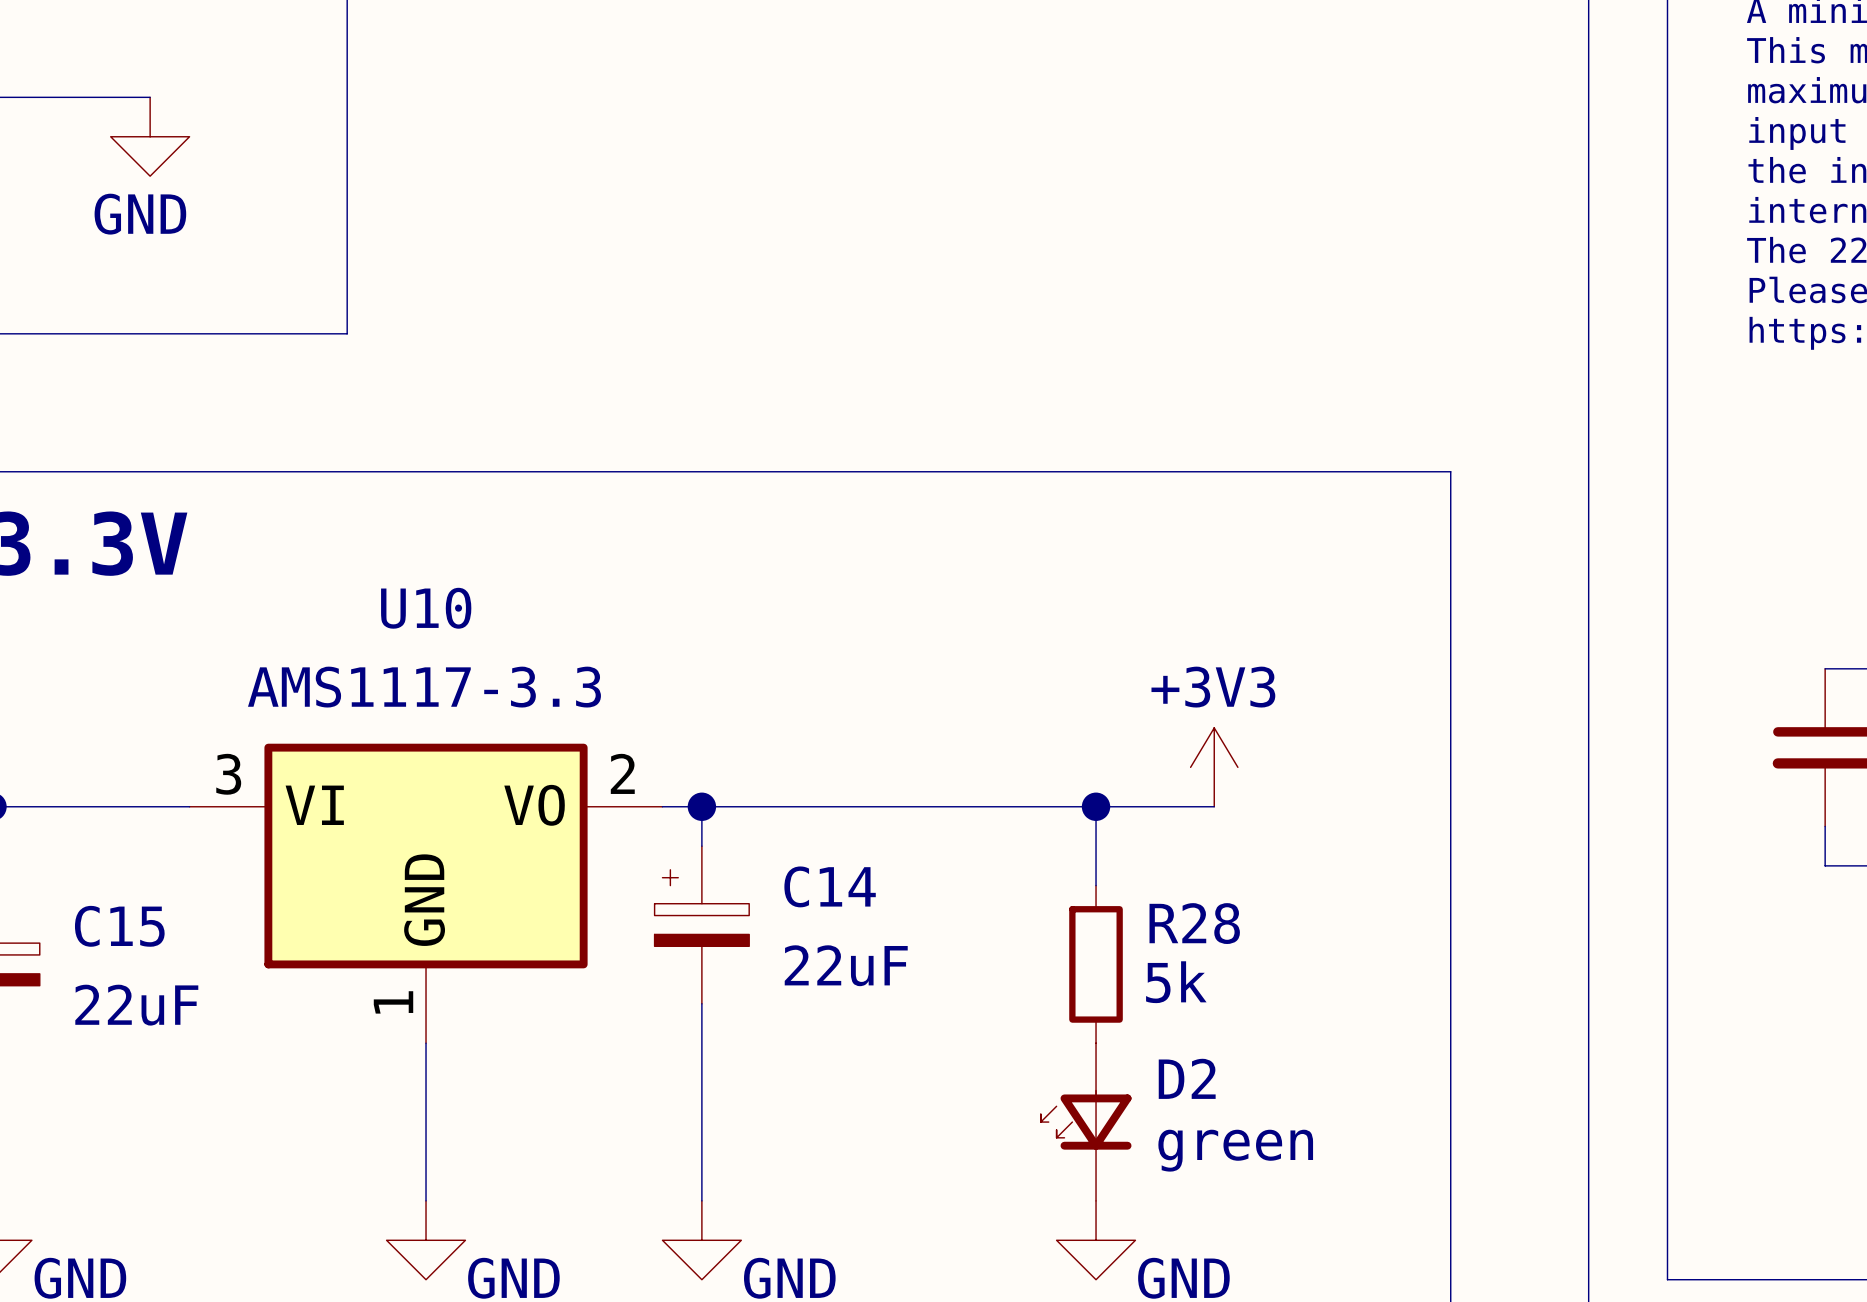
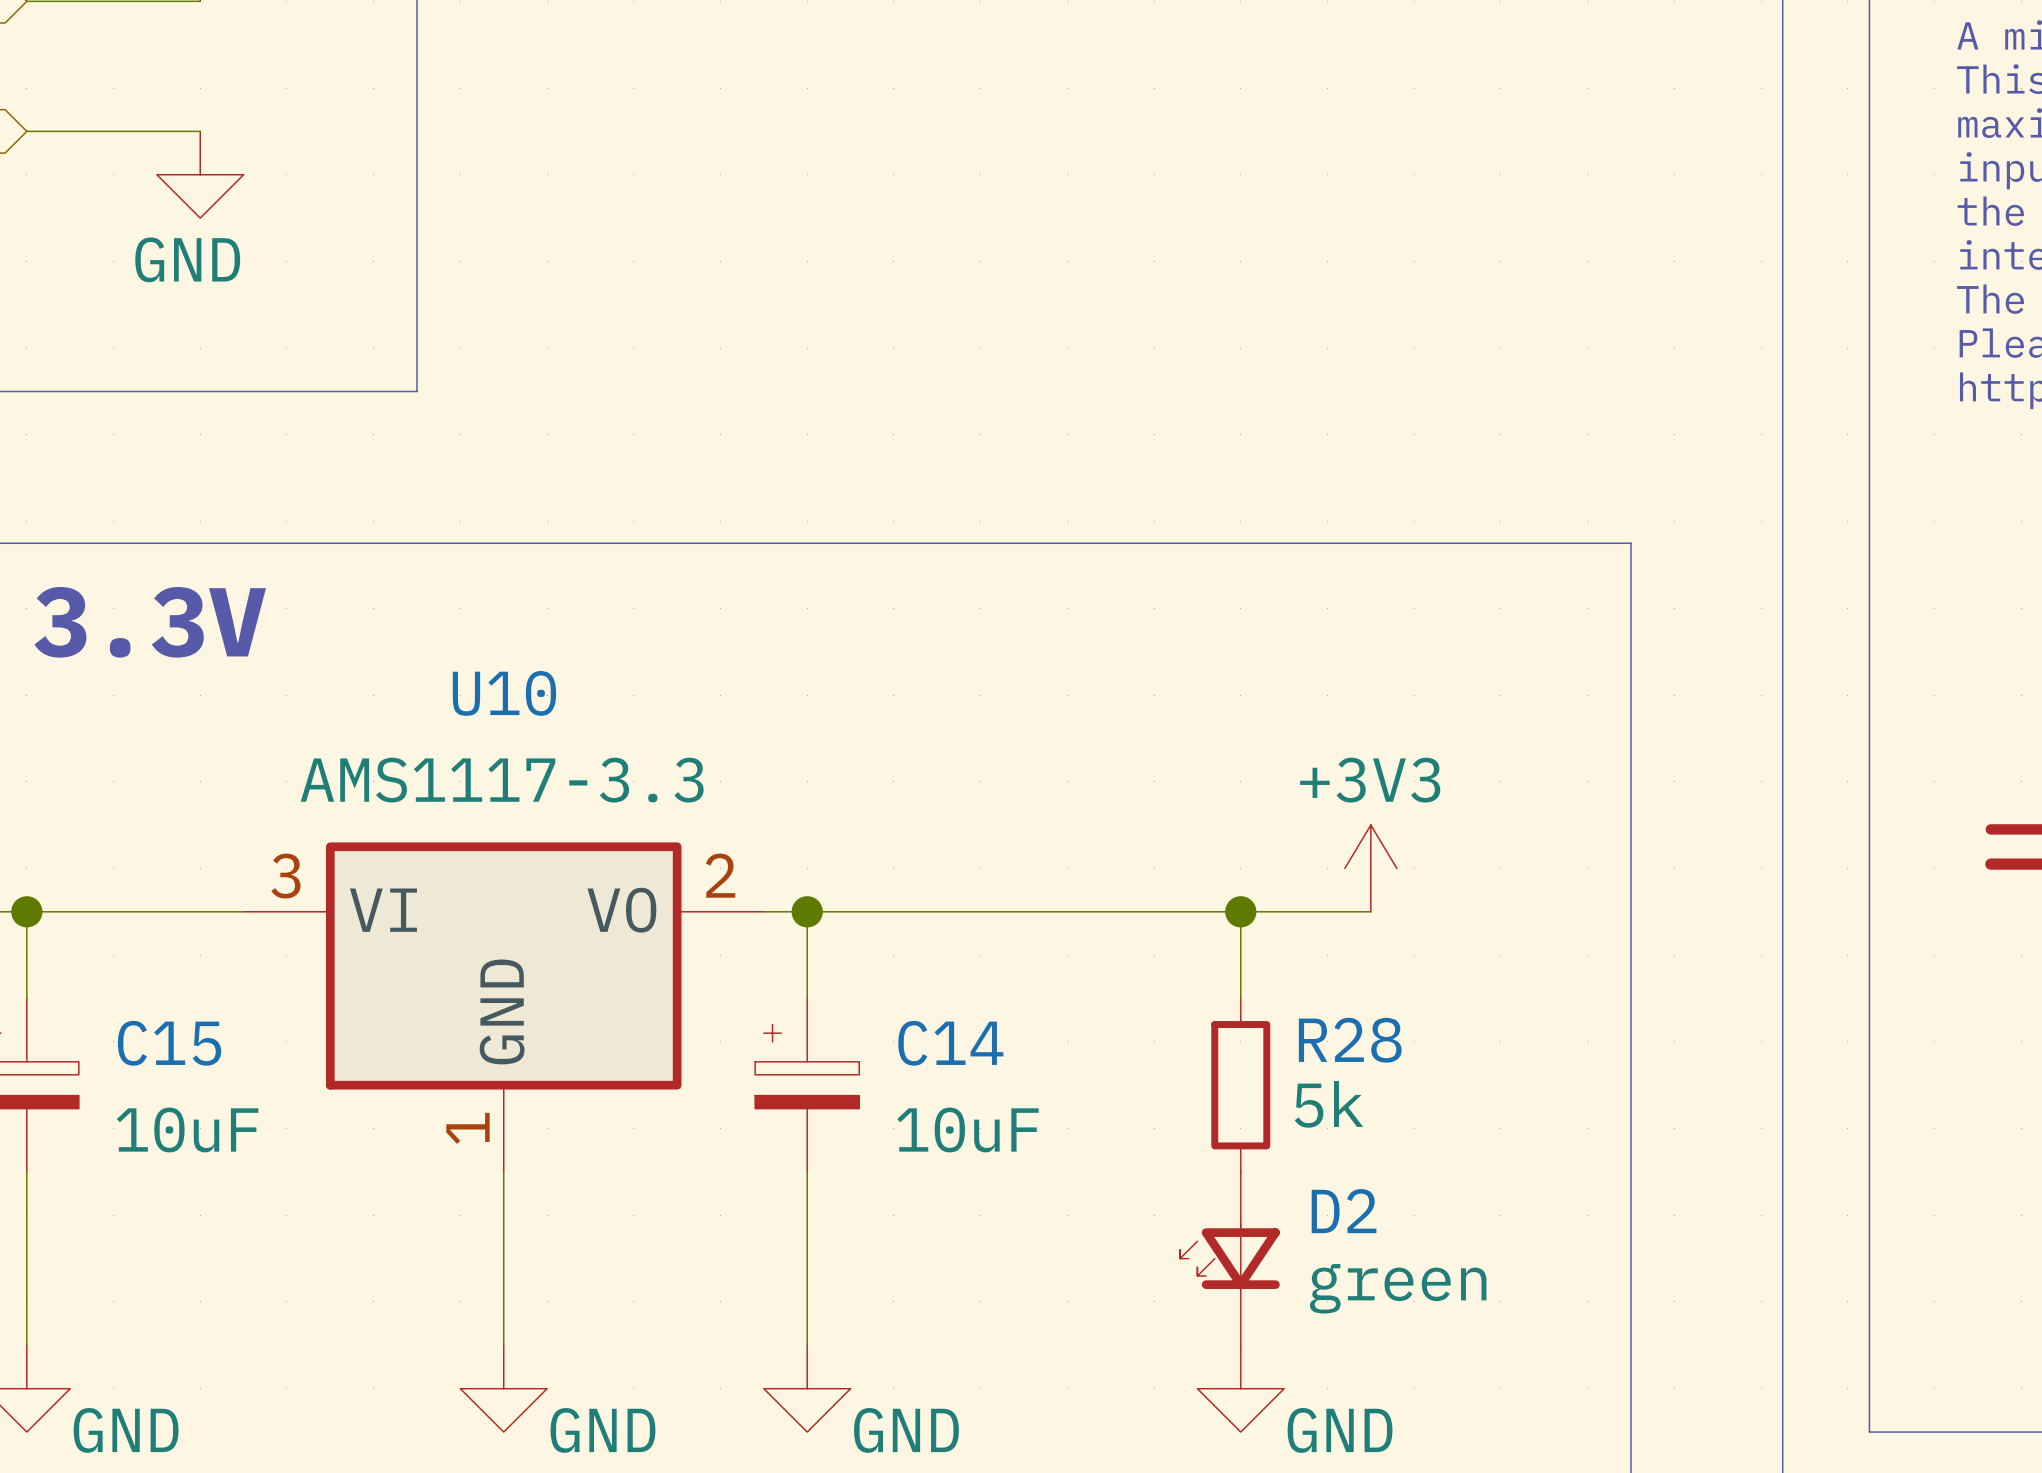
C14 position: (701, 925) -> (807, 1085)
C14 value: 22uF (846, 965) -> 10uF (967, 1129)
C15 value: 22uF (136, 1005) -> 10uF (187, 1129)

